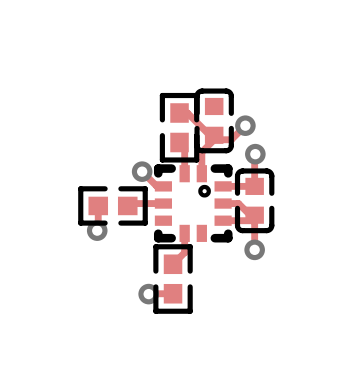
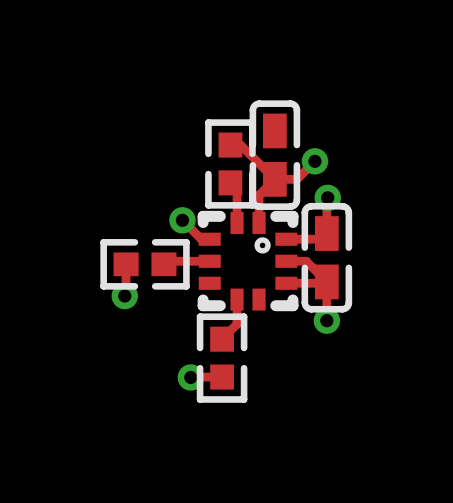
part footprint: [194, 88, 234, 154] -> [249, 100, 301, 210]
part footprint: [234, 168, 275, 234] -> [301, 202, 353, 313]

